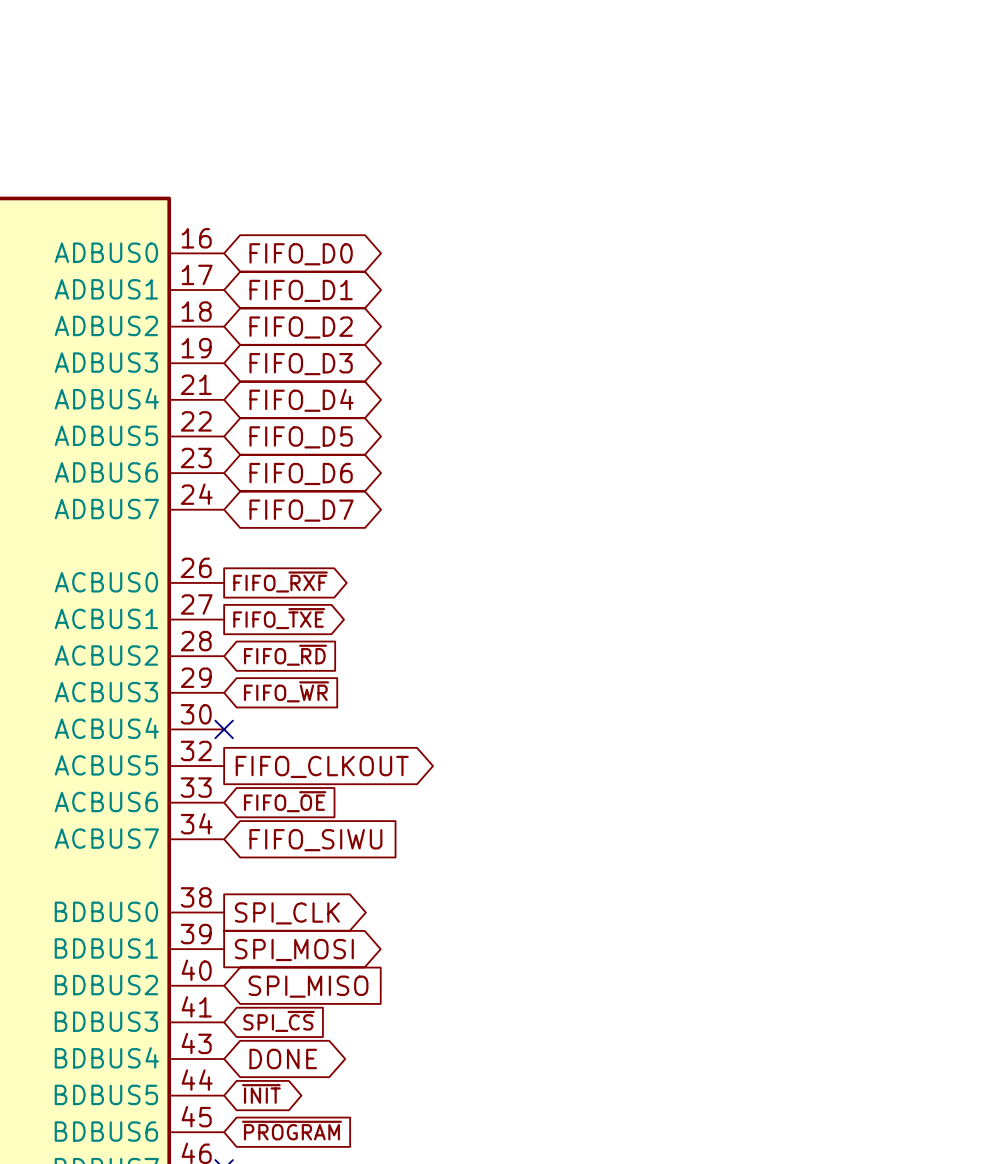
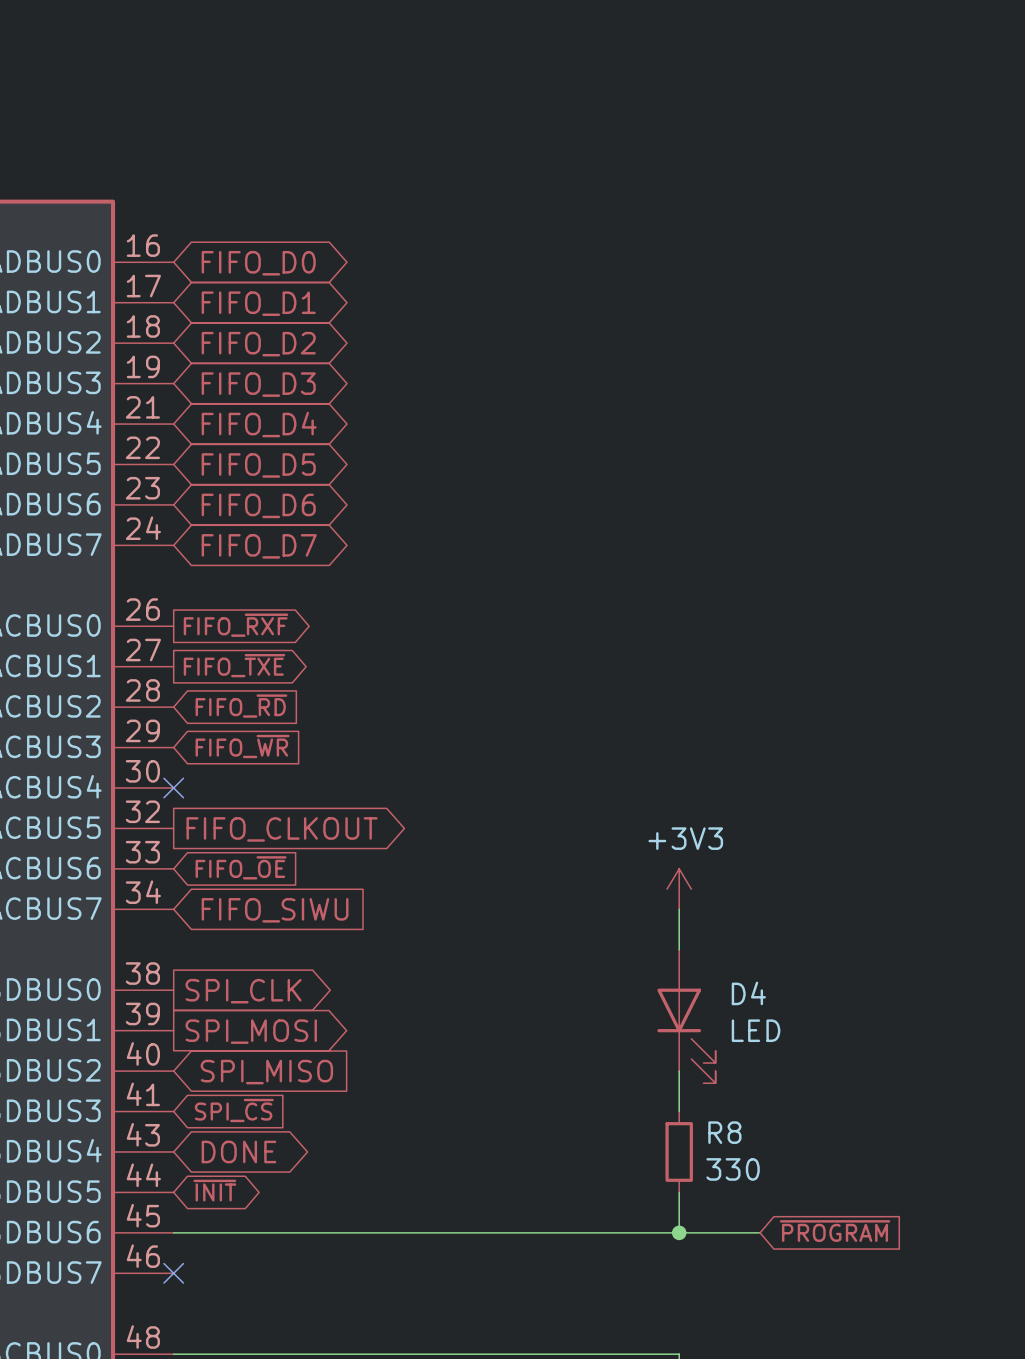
power symbol: none -> +3V3 (679, 889)
wire: none -> (679, 909) (679, 949)
D4: none -> LED (686, 1016)
wire: none -> (679, 1071) (679, 1111)
R8: none -> 330 (679, 1151)
wire: none -> (679, 1192) (679, 1232)
global label: ~{PROGRAM} (291, 1130) -> none
global label: none -> ~{PROGRAM} (835, 1231)
wire: none -> (173, 1232) (760, 1232)
junction: none -> (679, 1232)

